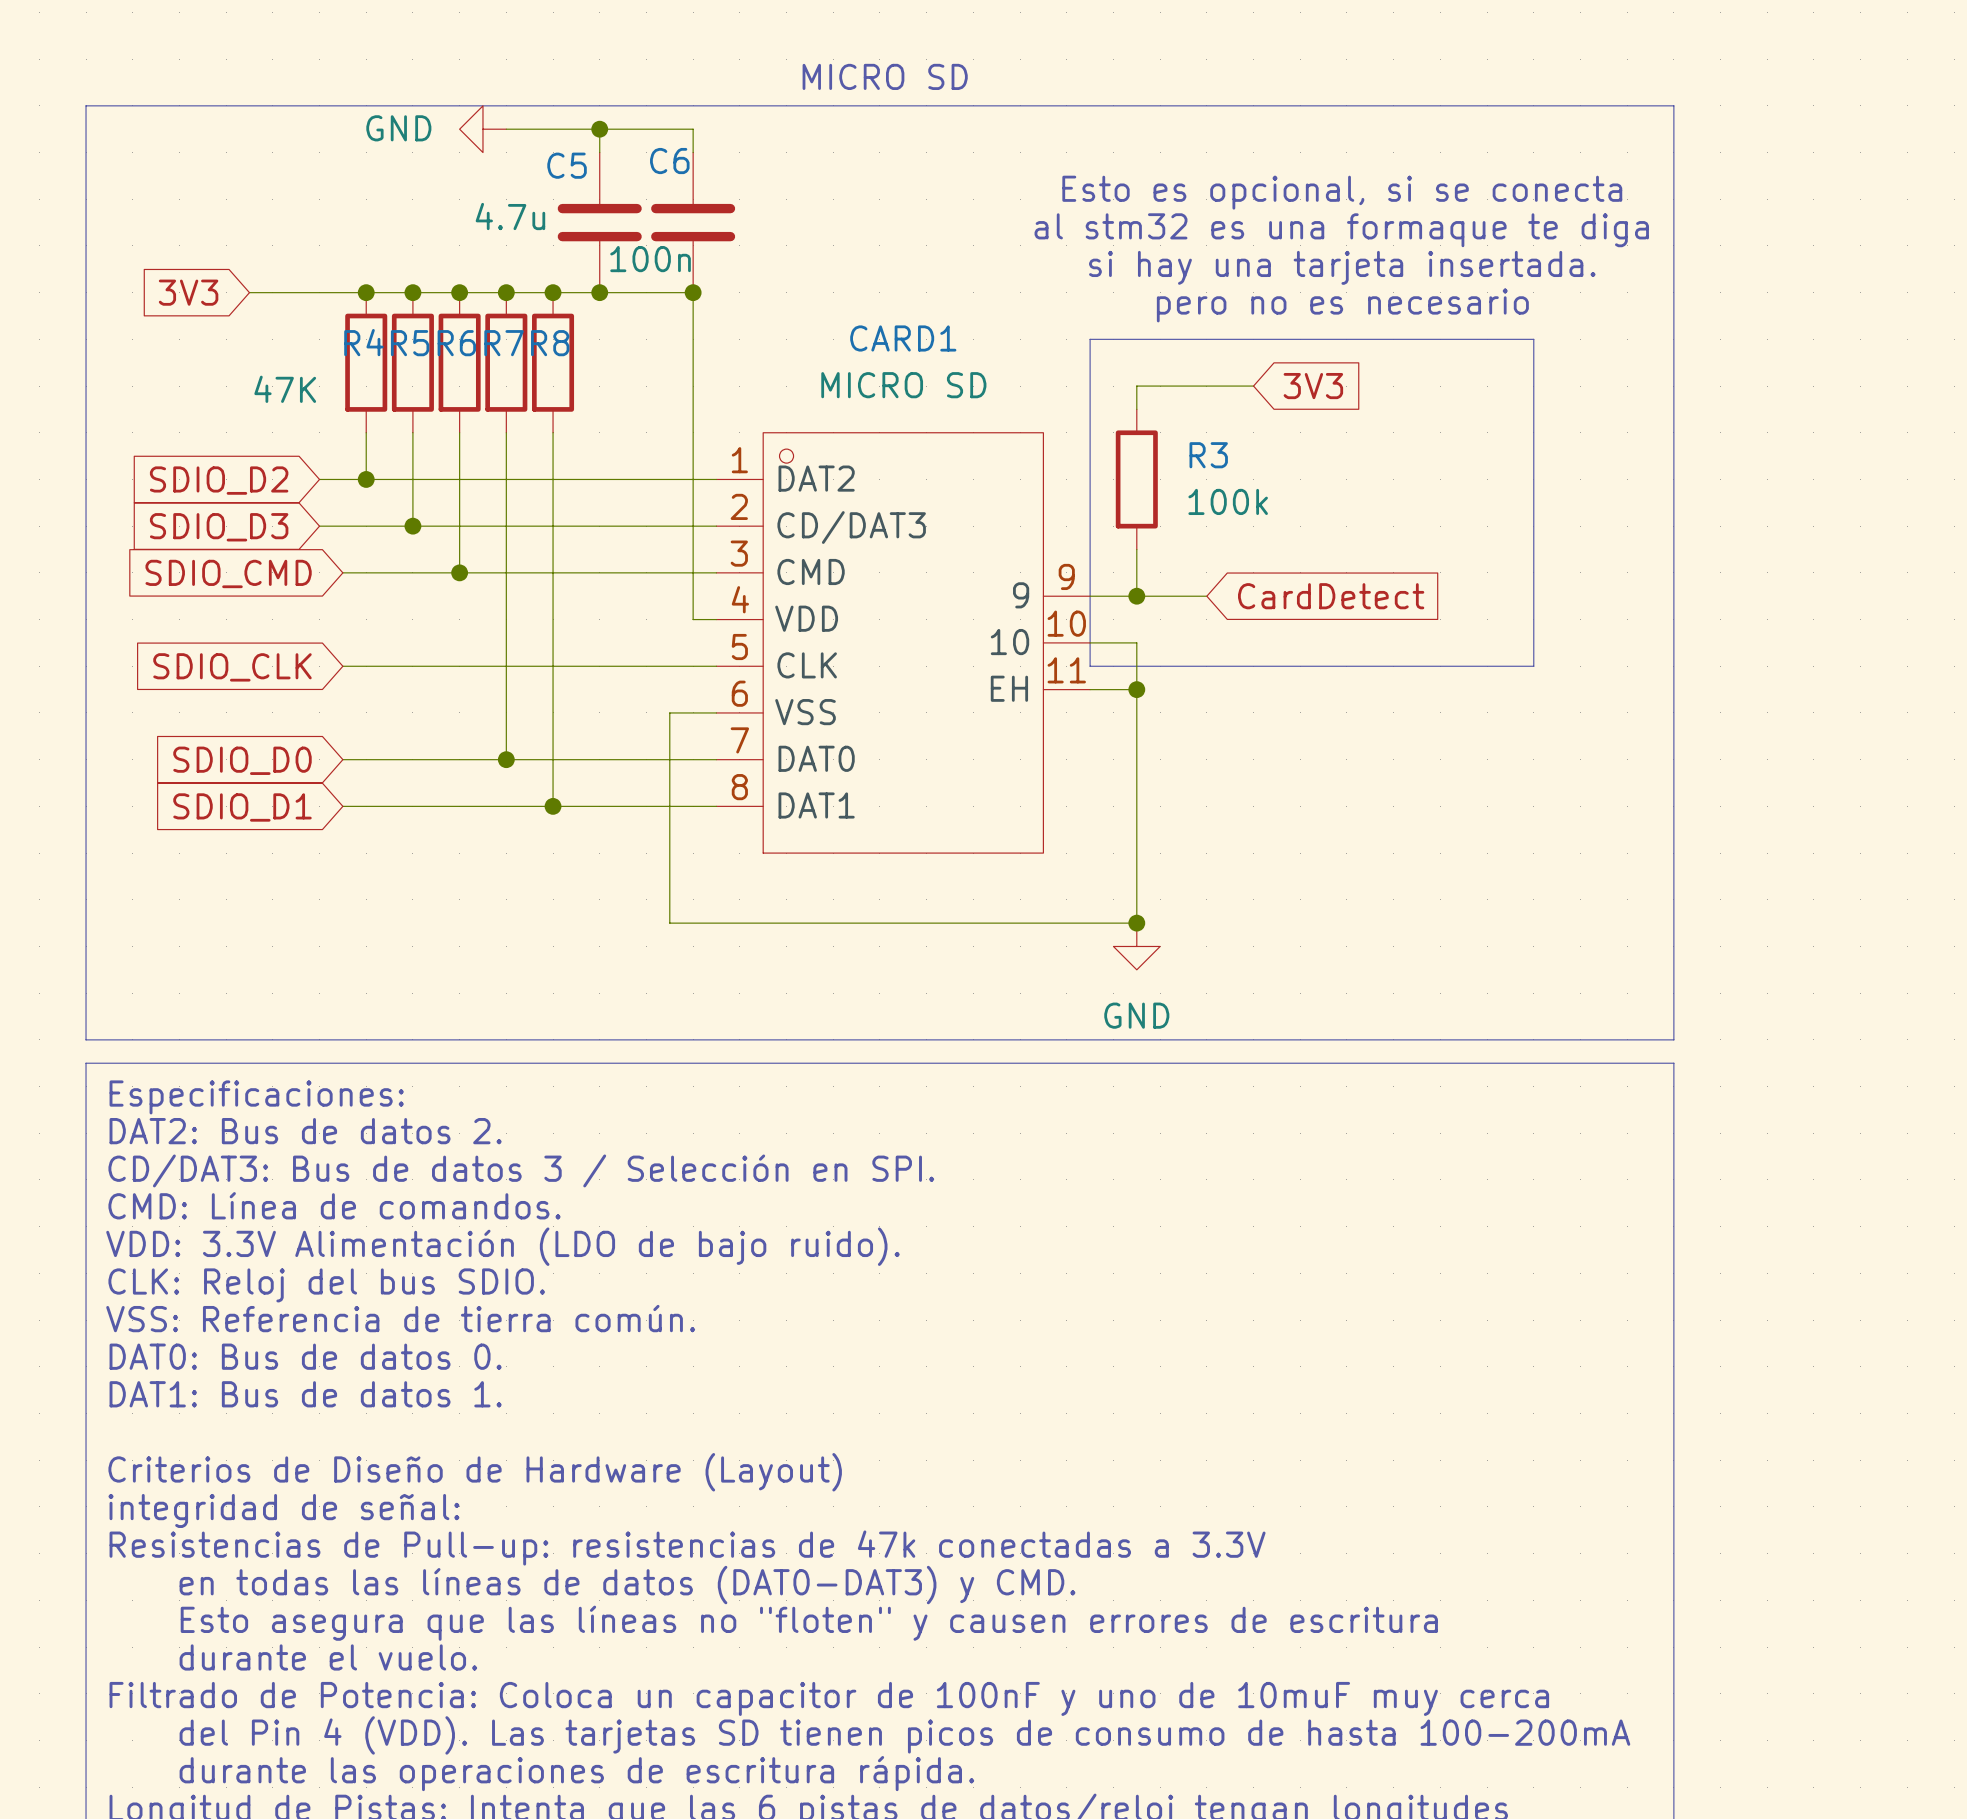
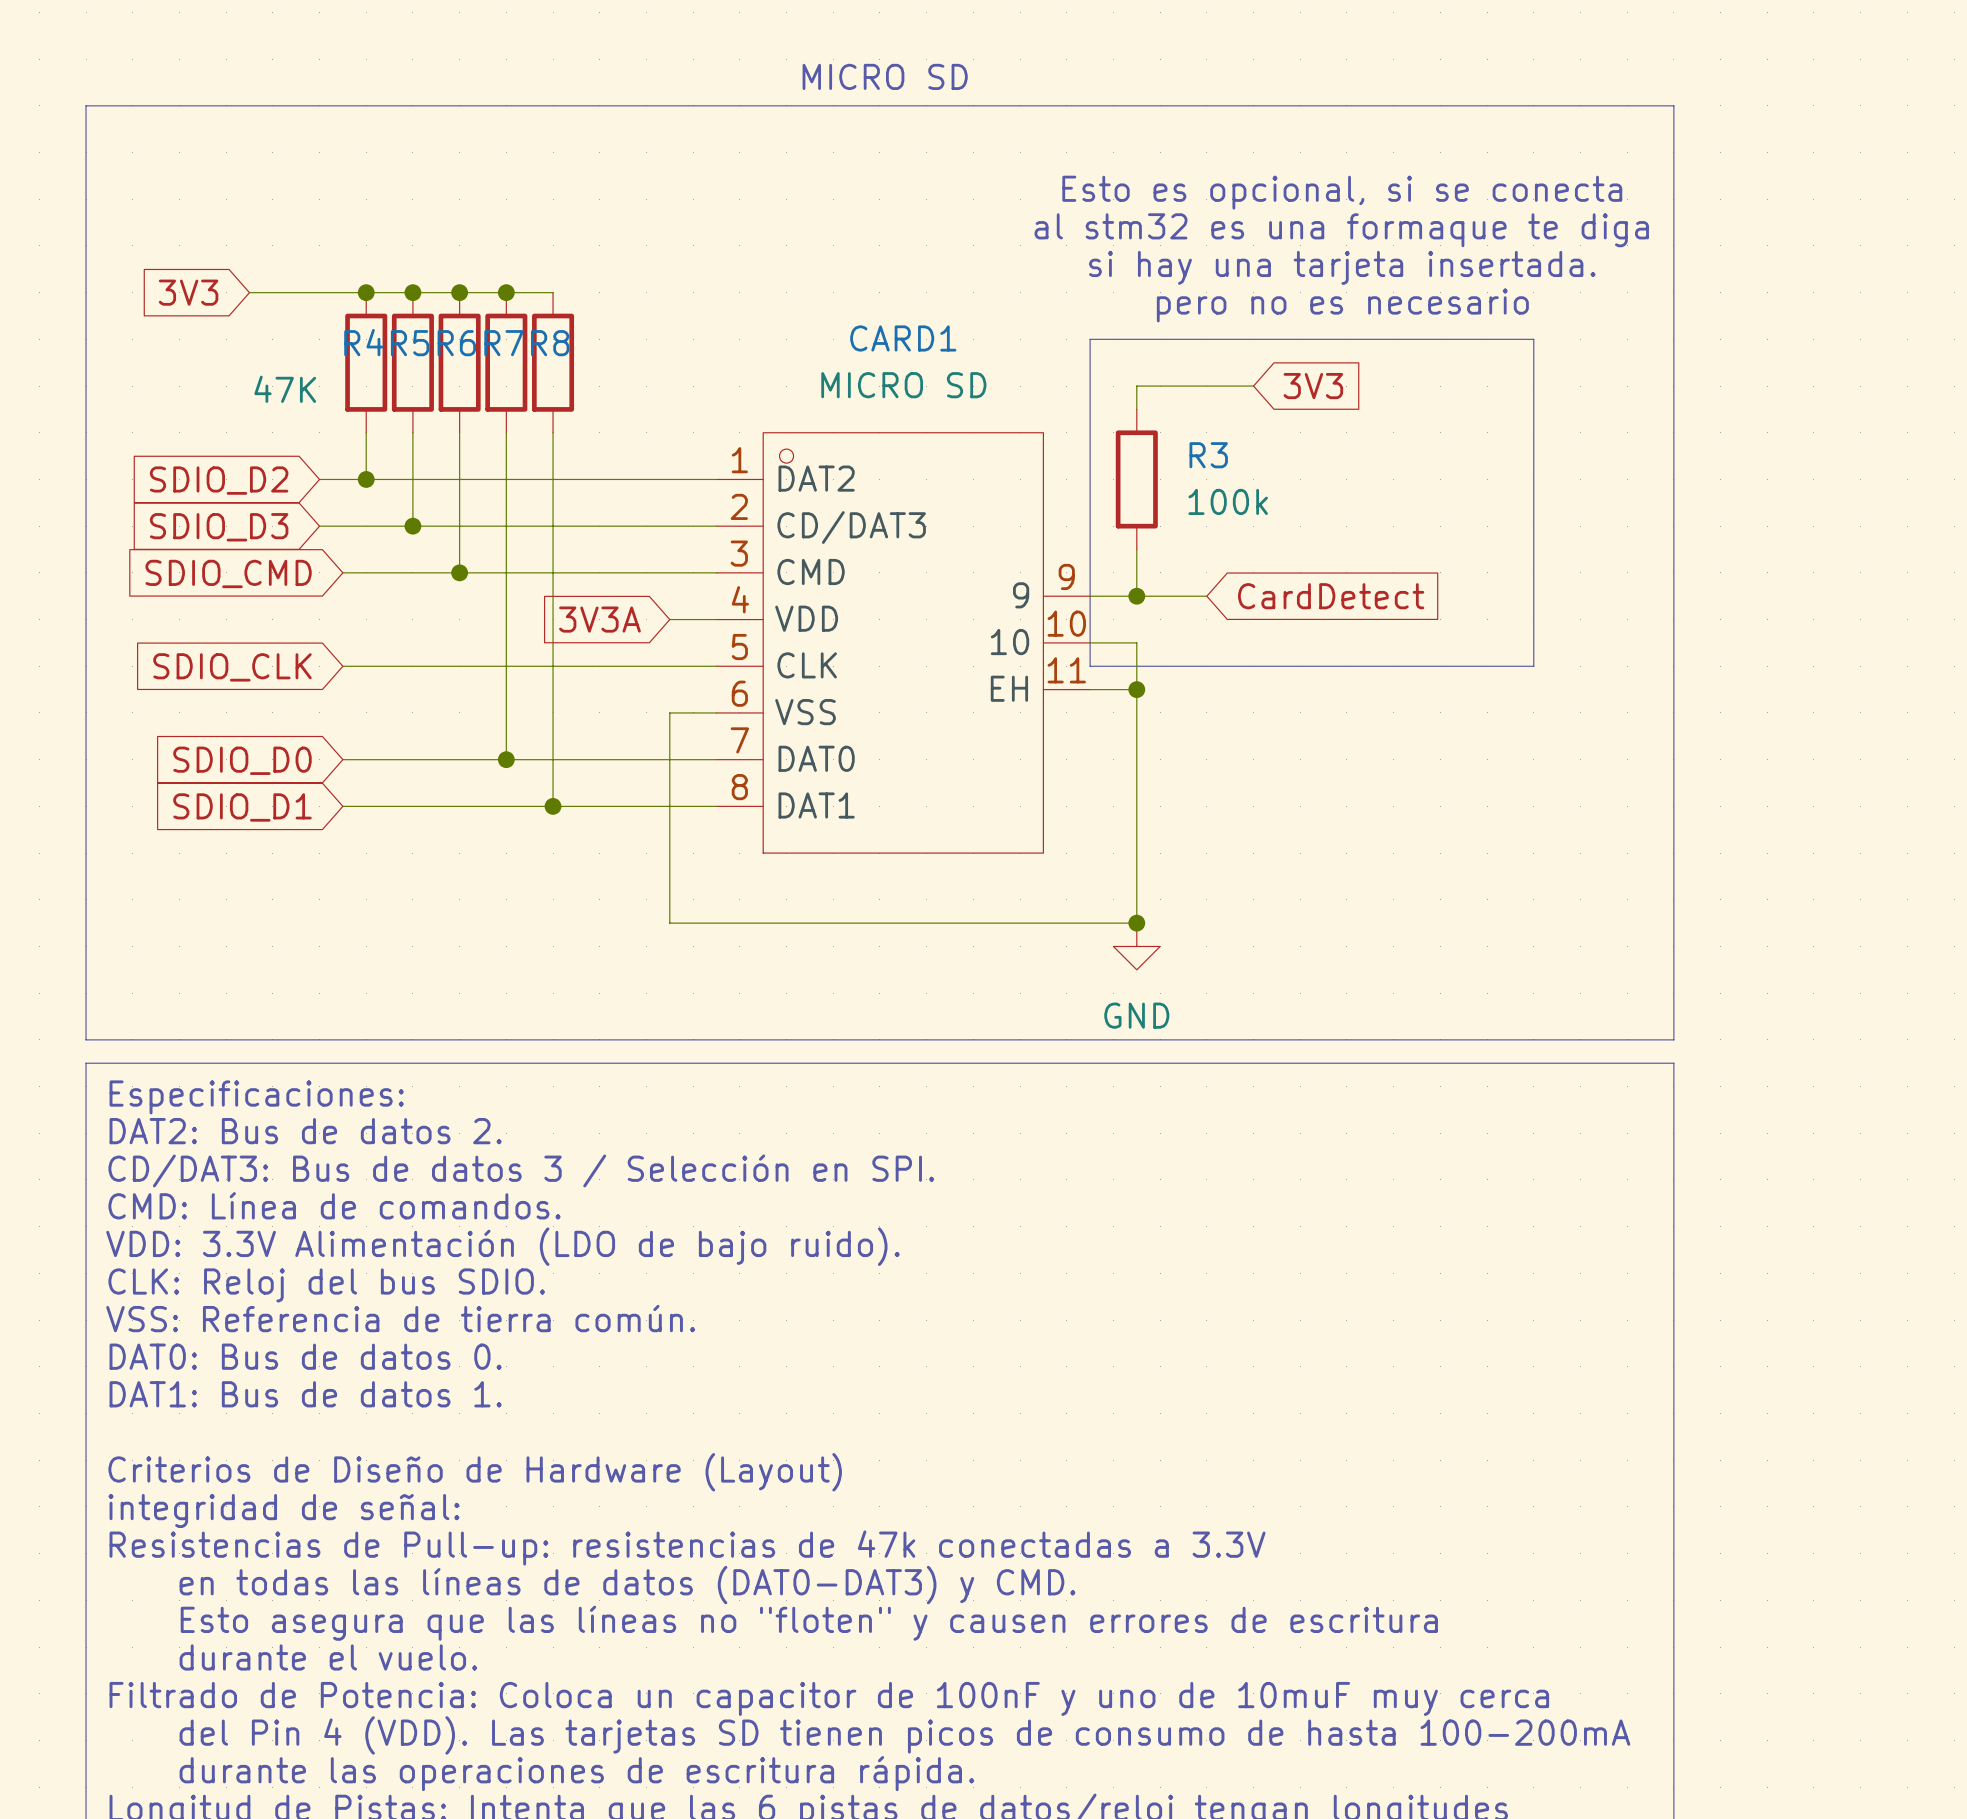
power symbol: GND (482, 129) -> none
wire: (506, 129) (693, 129) (693, 152) -> none
wire: (599, 129) (599, 152) -> none
junction: (599, 129) -> none
C5: 4.7u (599, 222) -> none
C6: 100n (693, 222) -> none
wire: (553, 292) (693, 292) (693, 619) -> (669, 619) (693, 619)
junction: (553, 292) -> none
junction: (599, 292) -> none
junction: (693, 292) -> none
global label: none -> 3V3A (599, 619)

